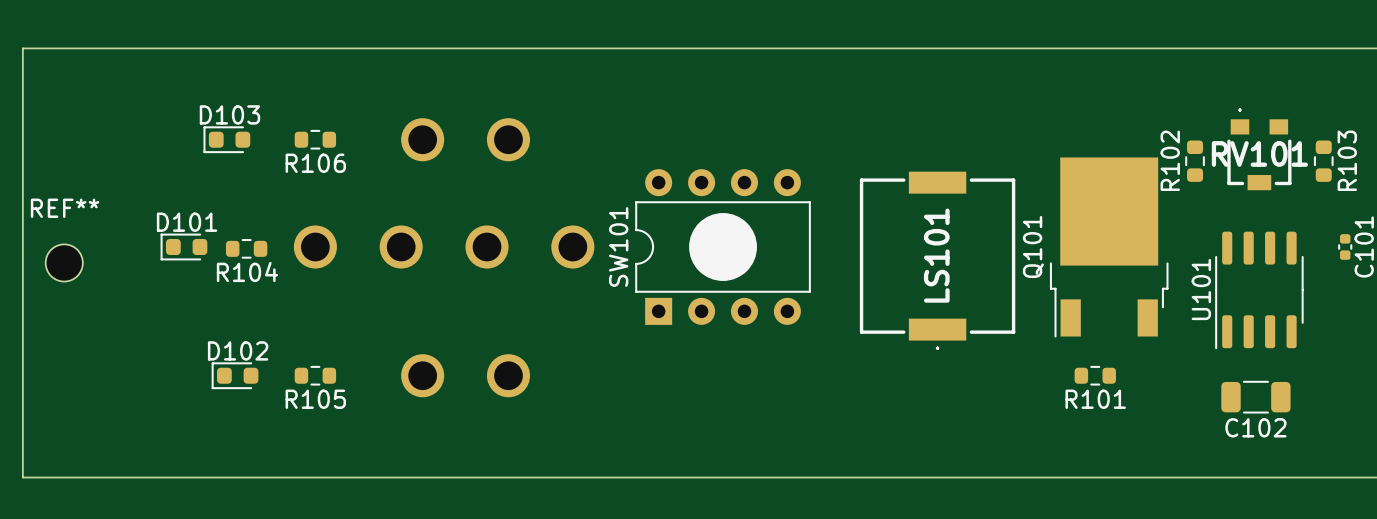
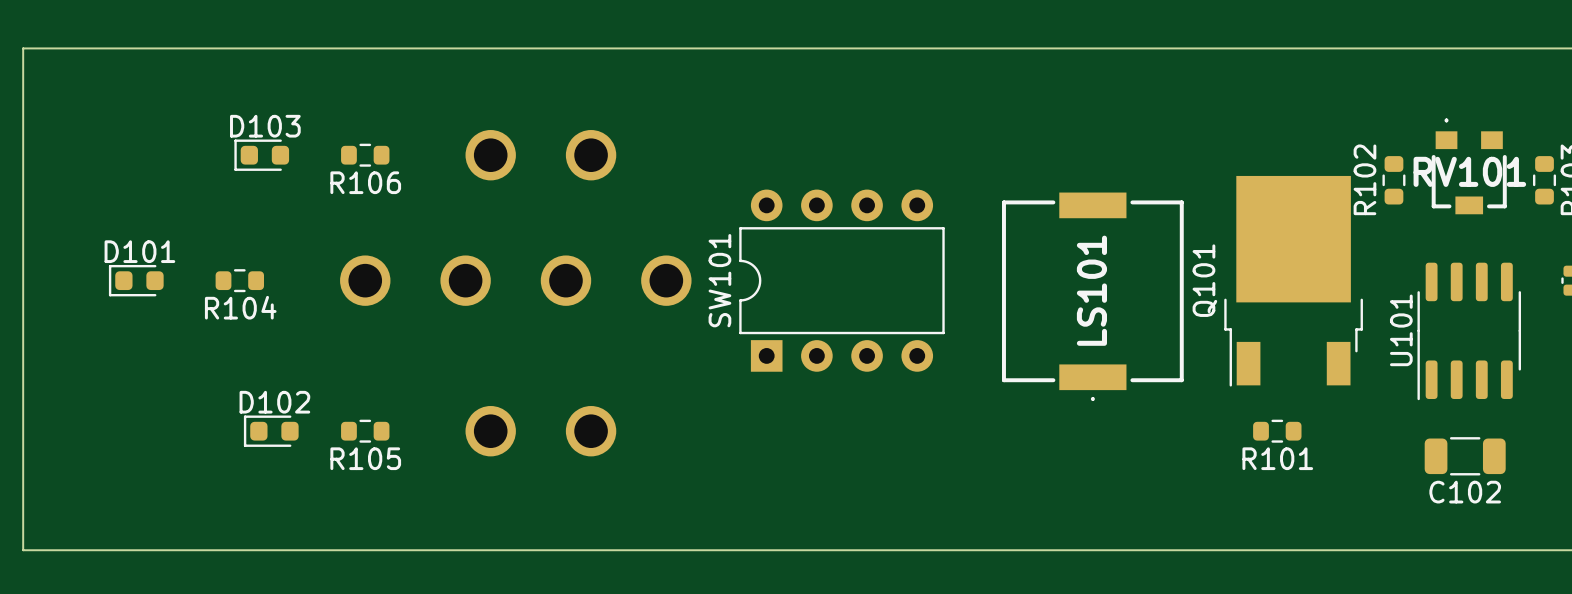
SW101 footprint: [635, 169, 811, 325] -> [739, 189, 945, 372]
D101 position: (183, 247) -> (136, 280)
R104 position: (246, 248) -> (239, 280)
REF**: (64, 262) -> none

